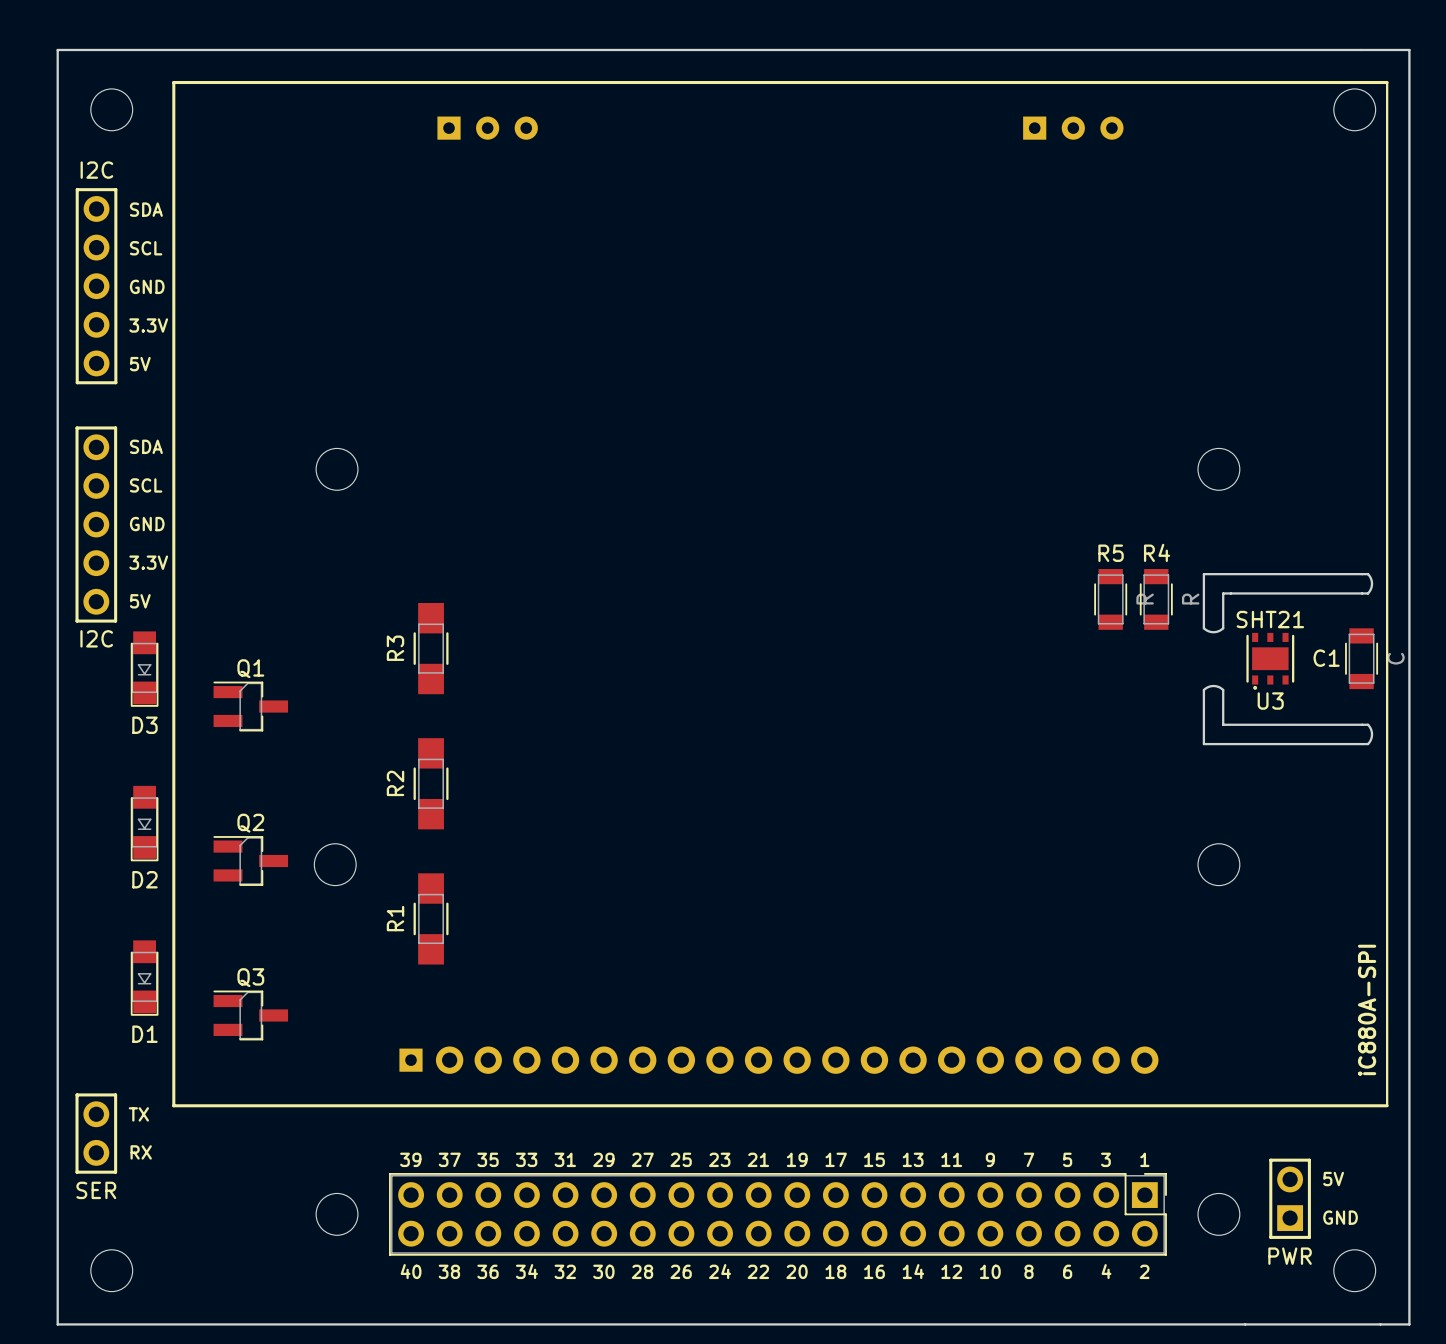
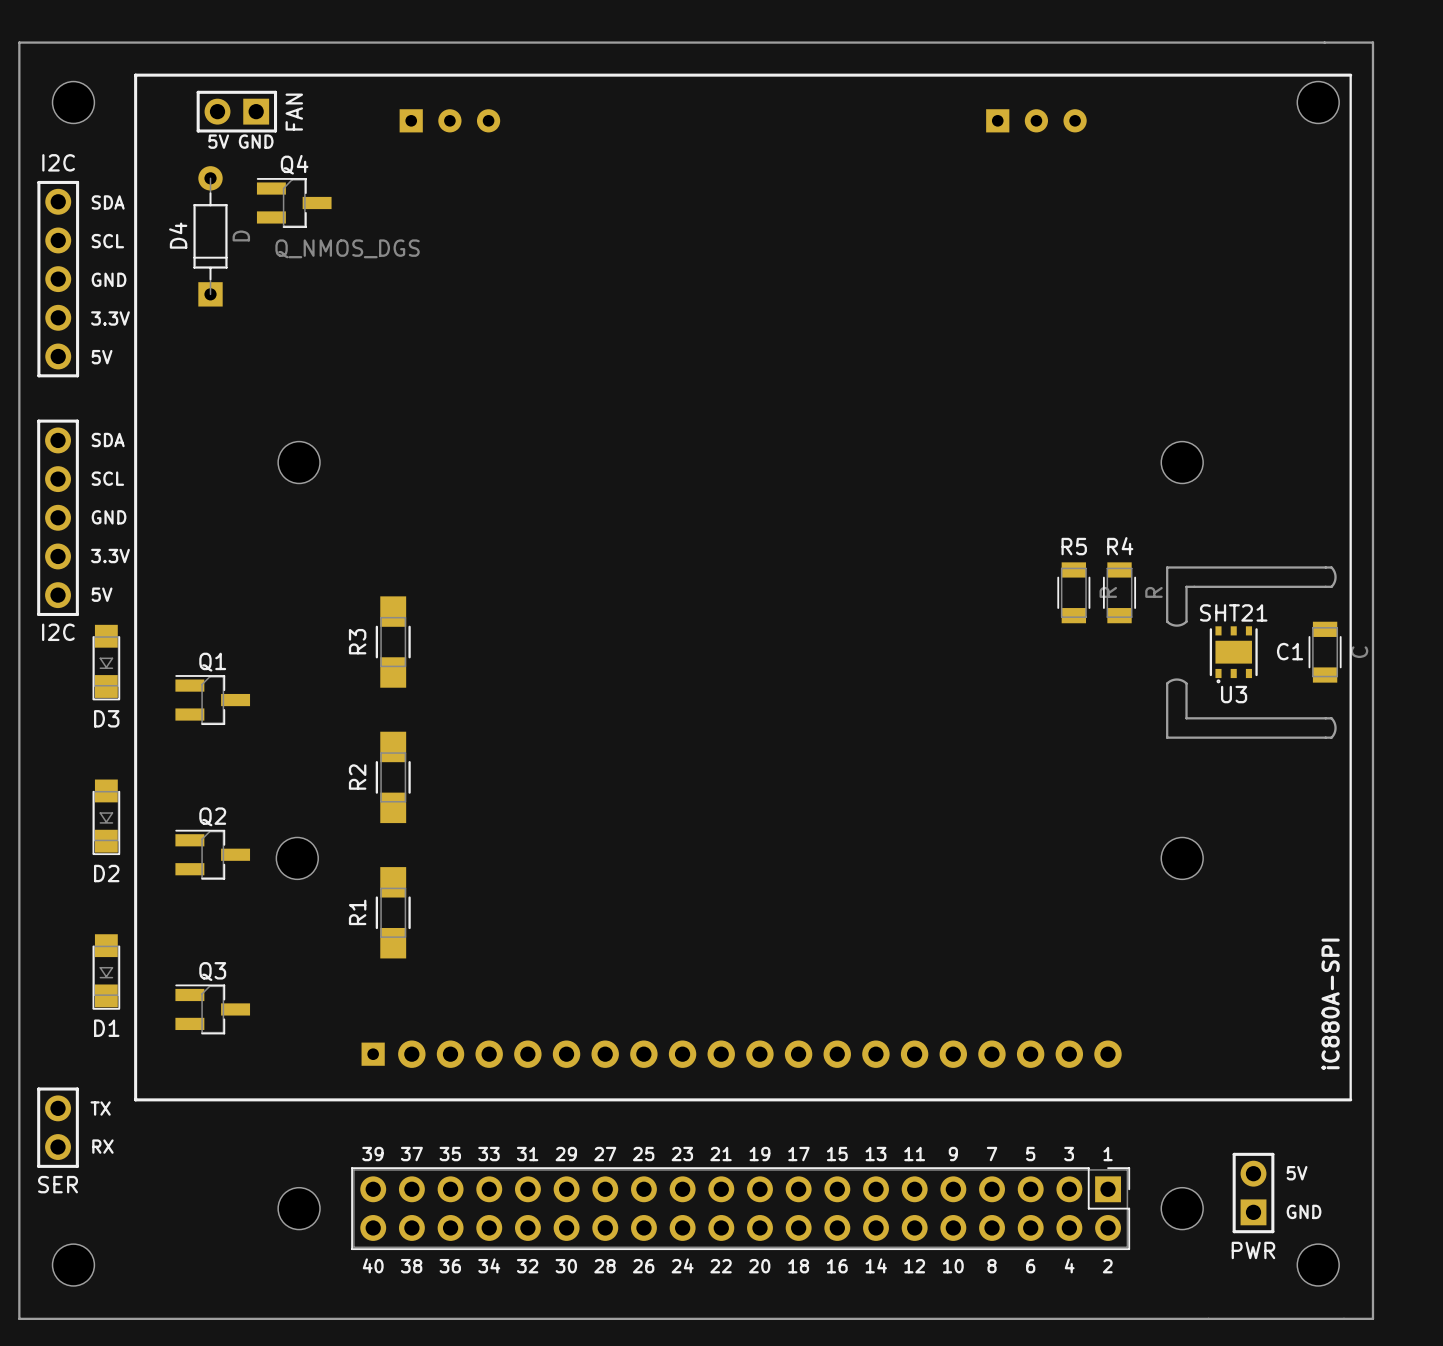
part: none -> FAN (236, 111)
text: none -> 5V (218, 141)
text: none -> GND (256, 141)
Q4: none -> Q_NMOS_DGS (294, 203)
D4: none -> D (210, 236)

